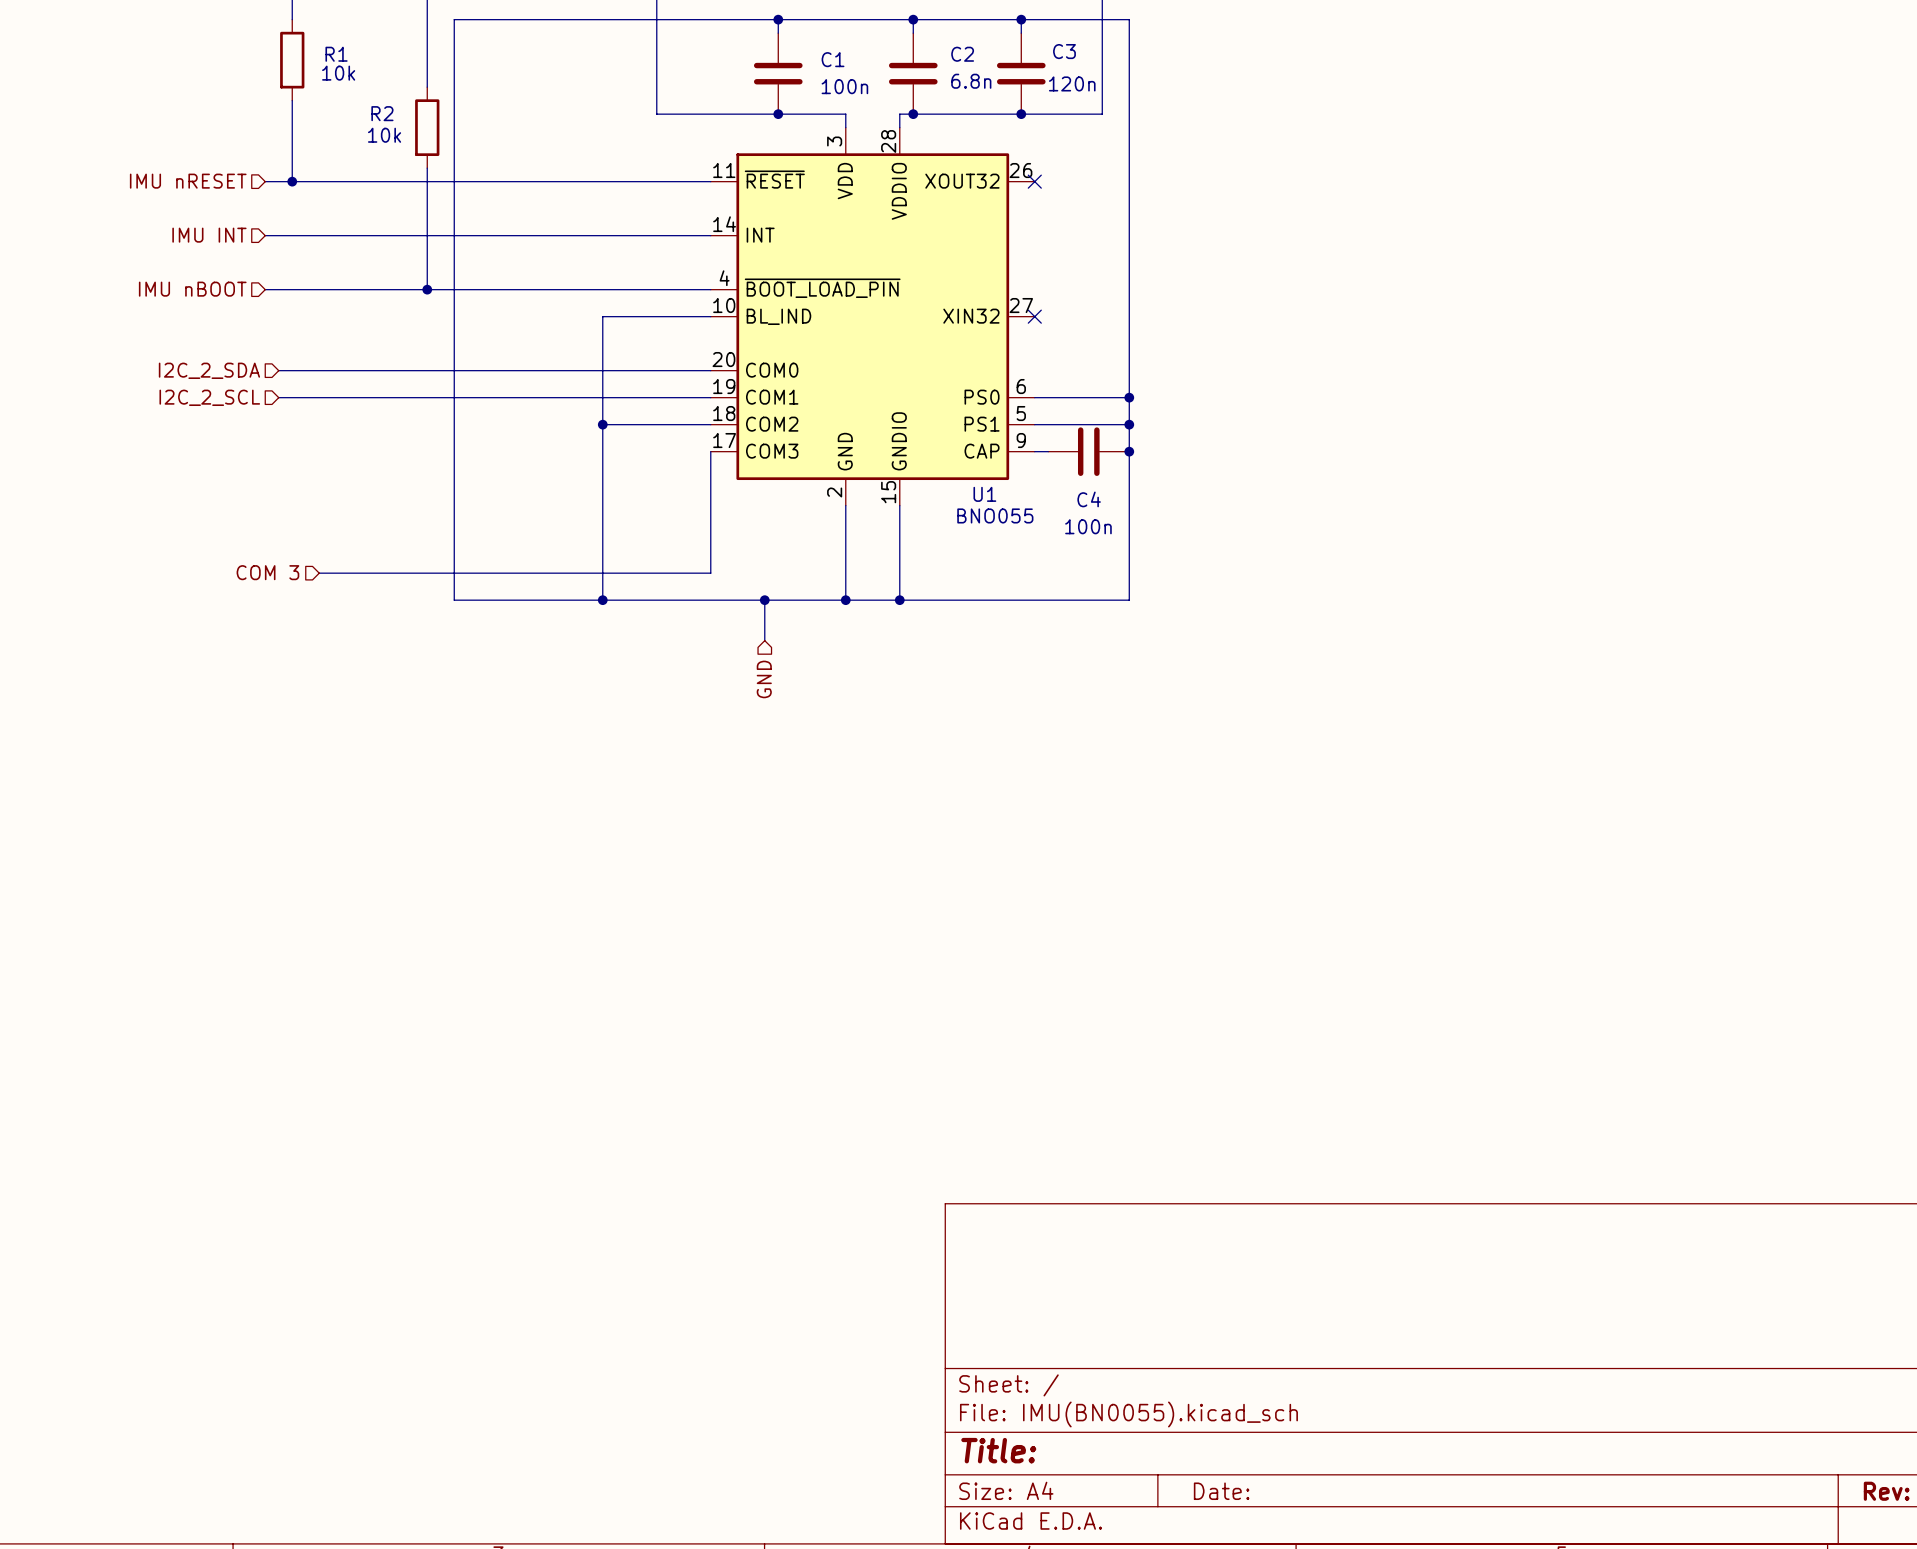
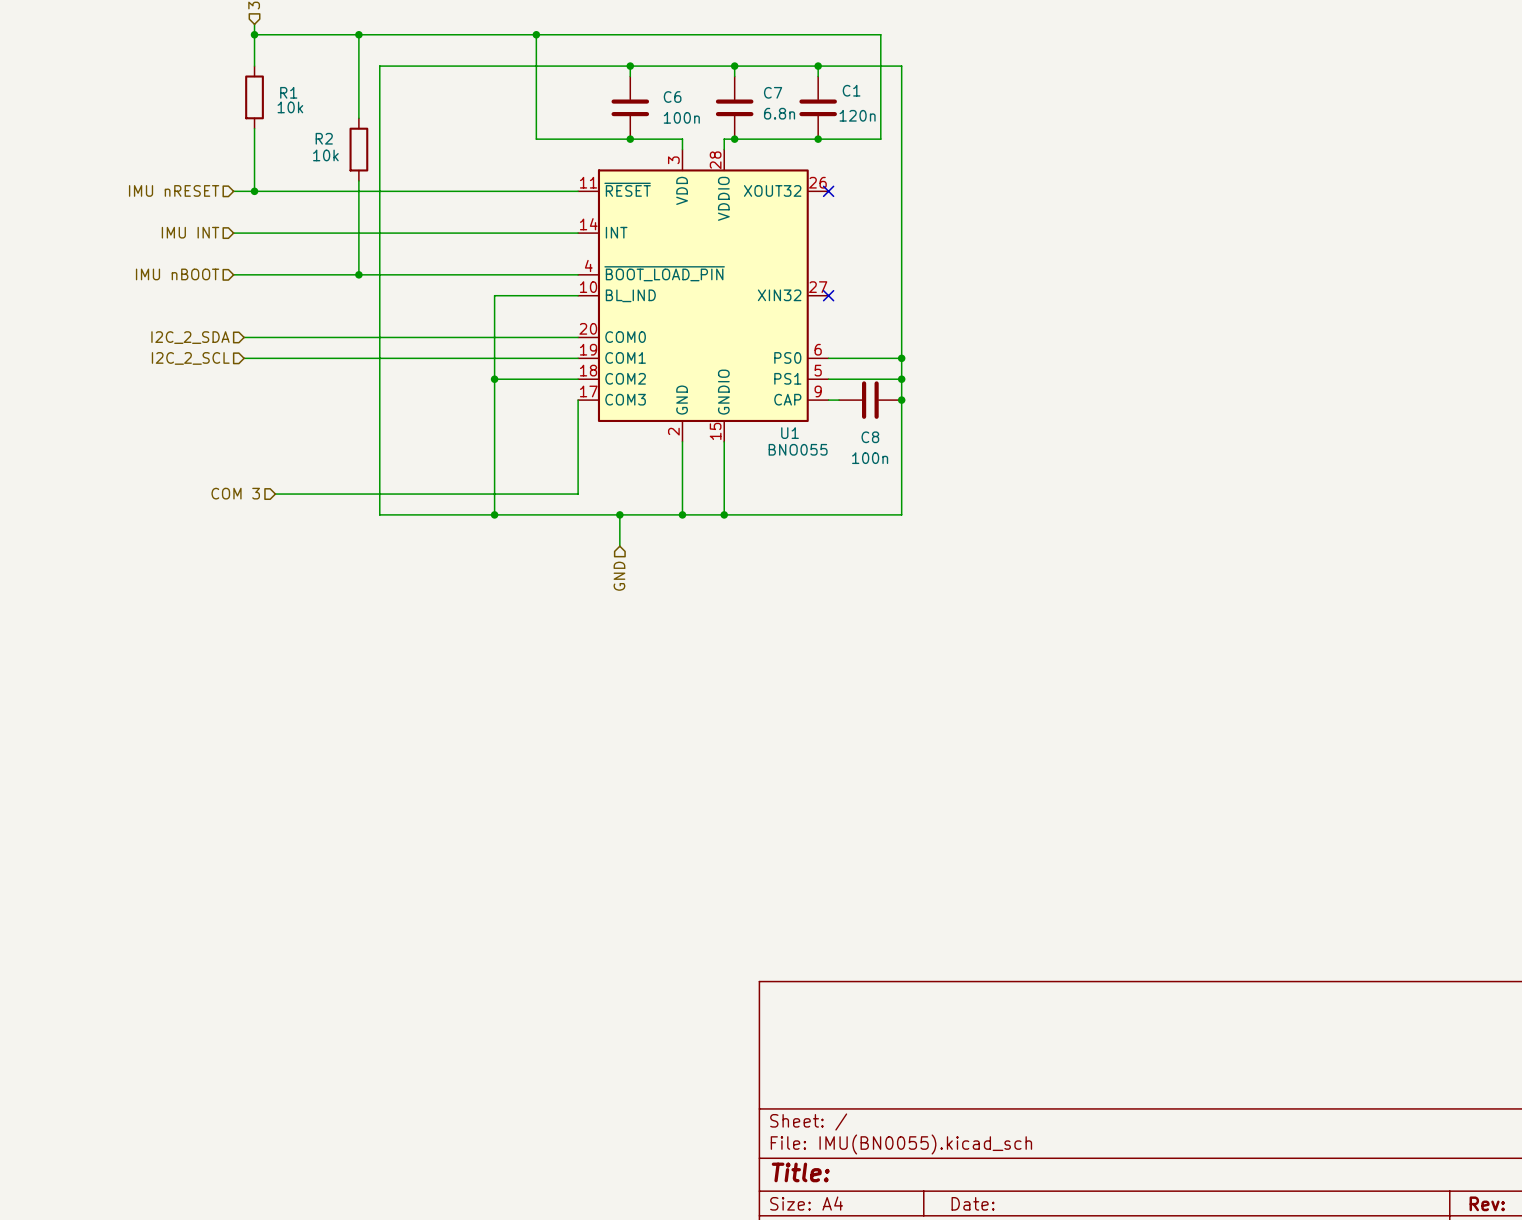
C3 name: C3 (1064, 51) -> C1 (851, 90)
C2 name: C2 (962, 54) -> C7 (773, 92)
C1 name: C1 (833, 59) -> C6 (672, 97)
C4 name: C4 (1089, 499) -> C8 (870, 437)

